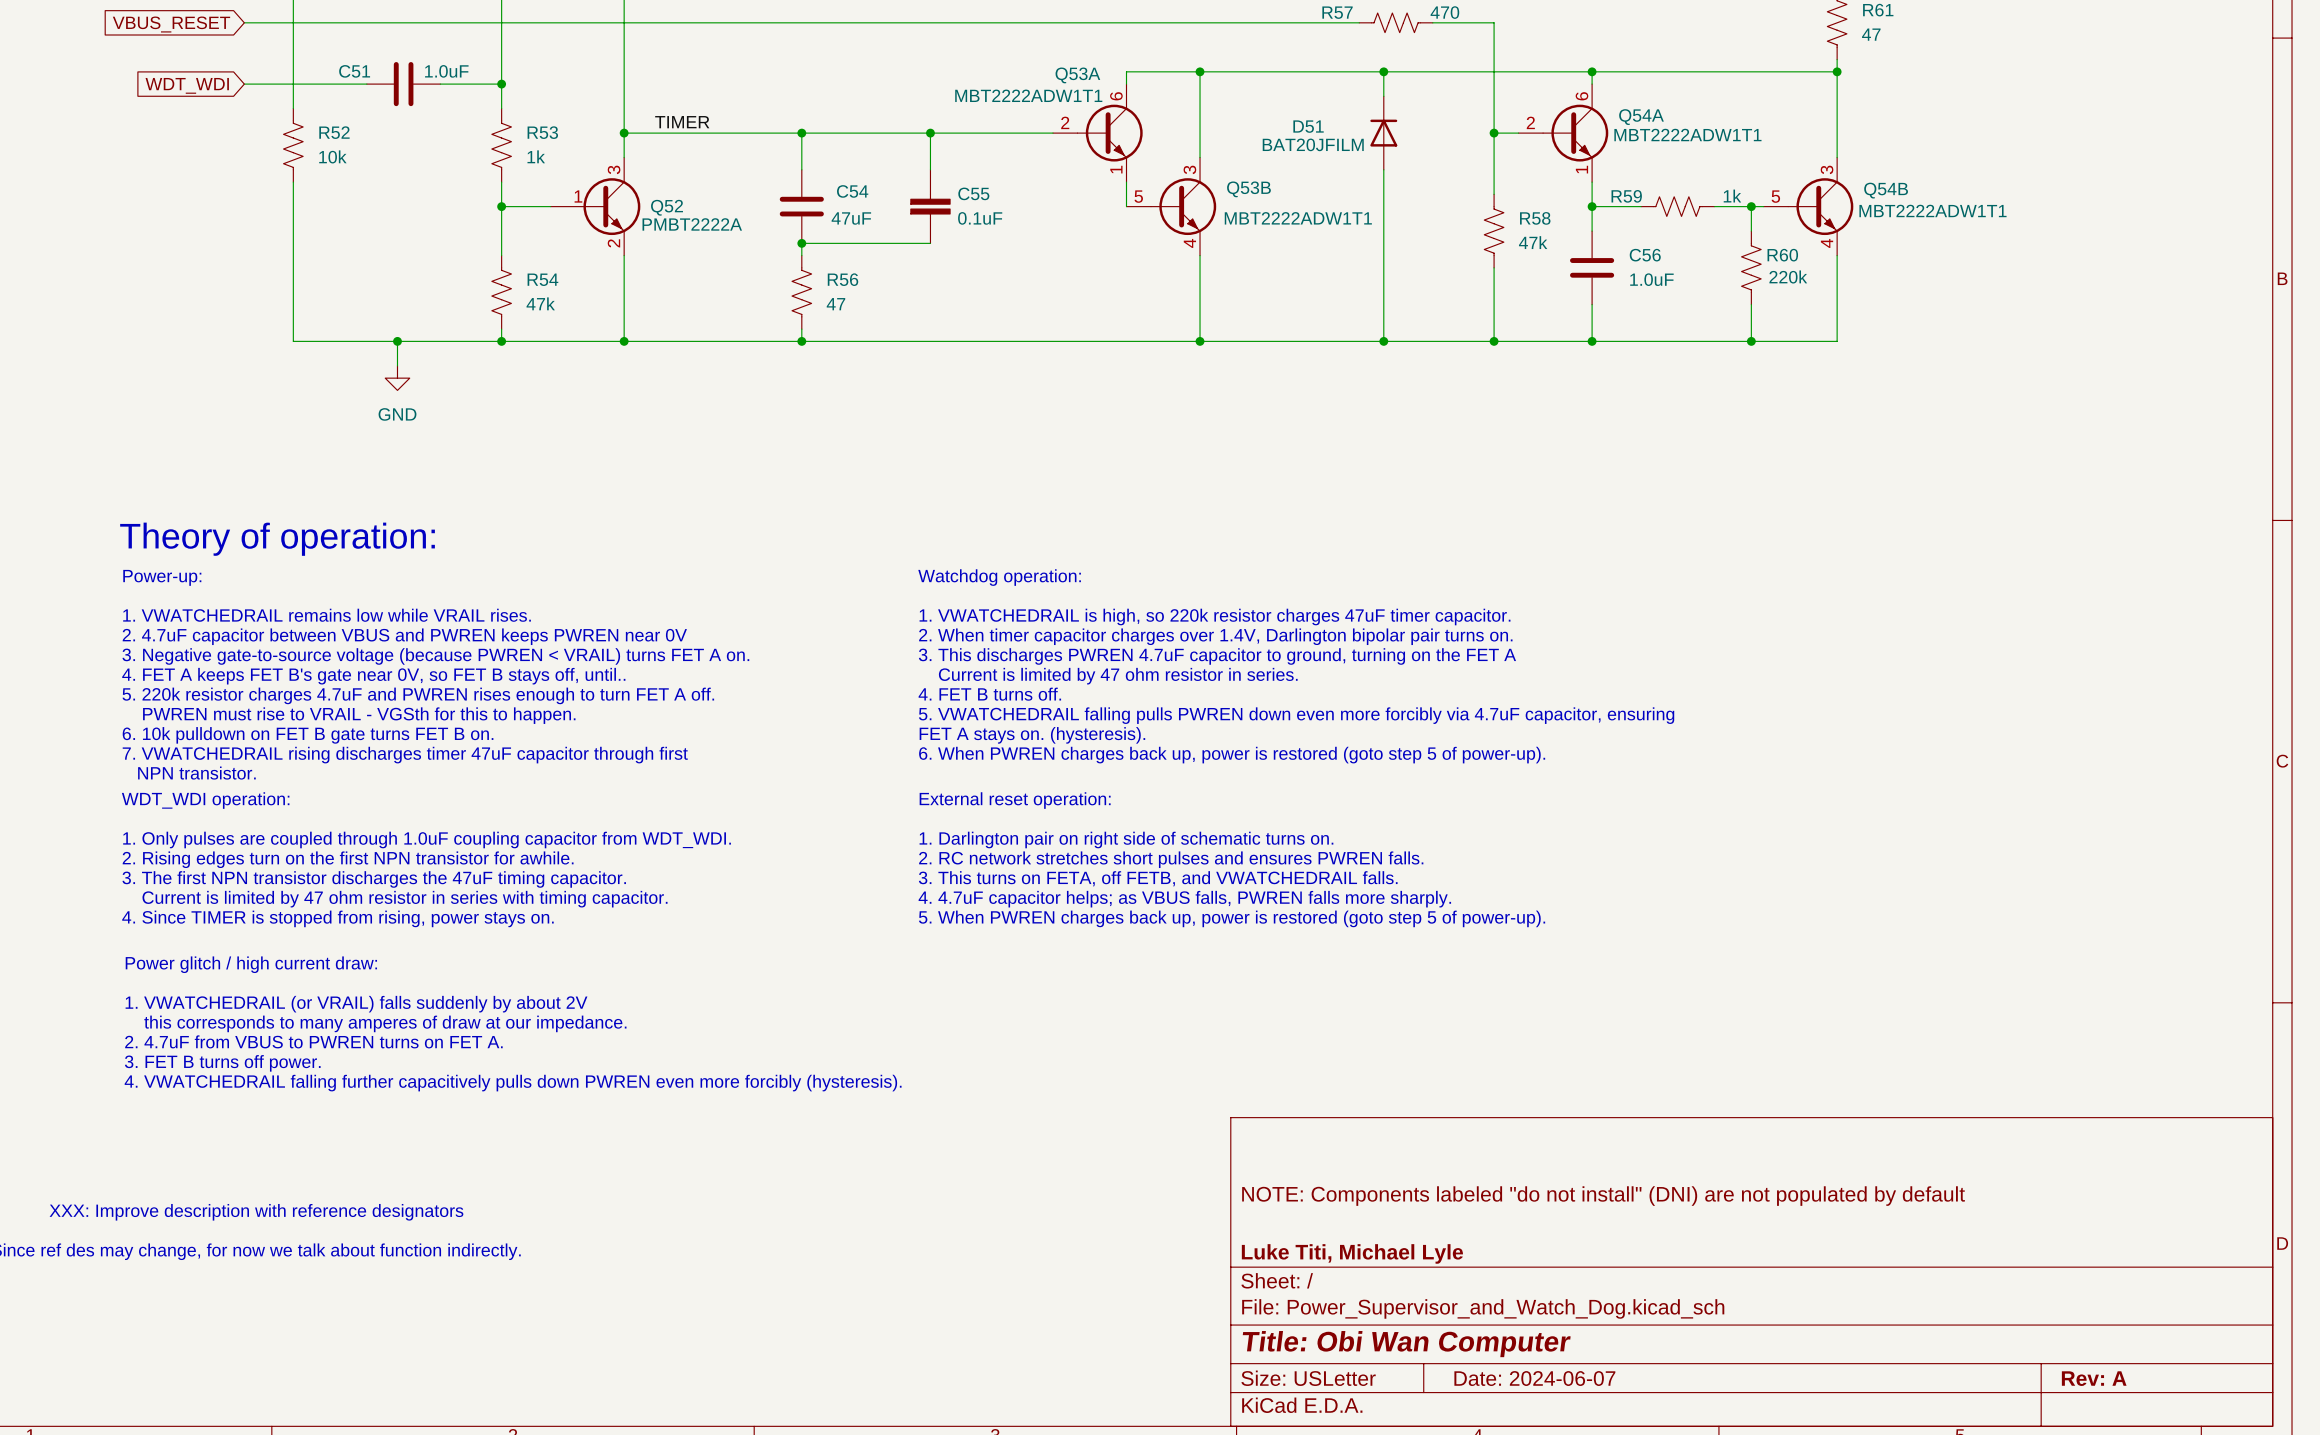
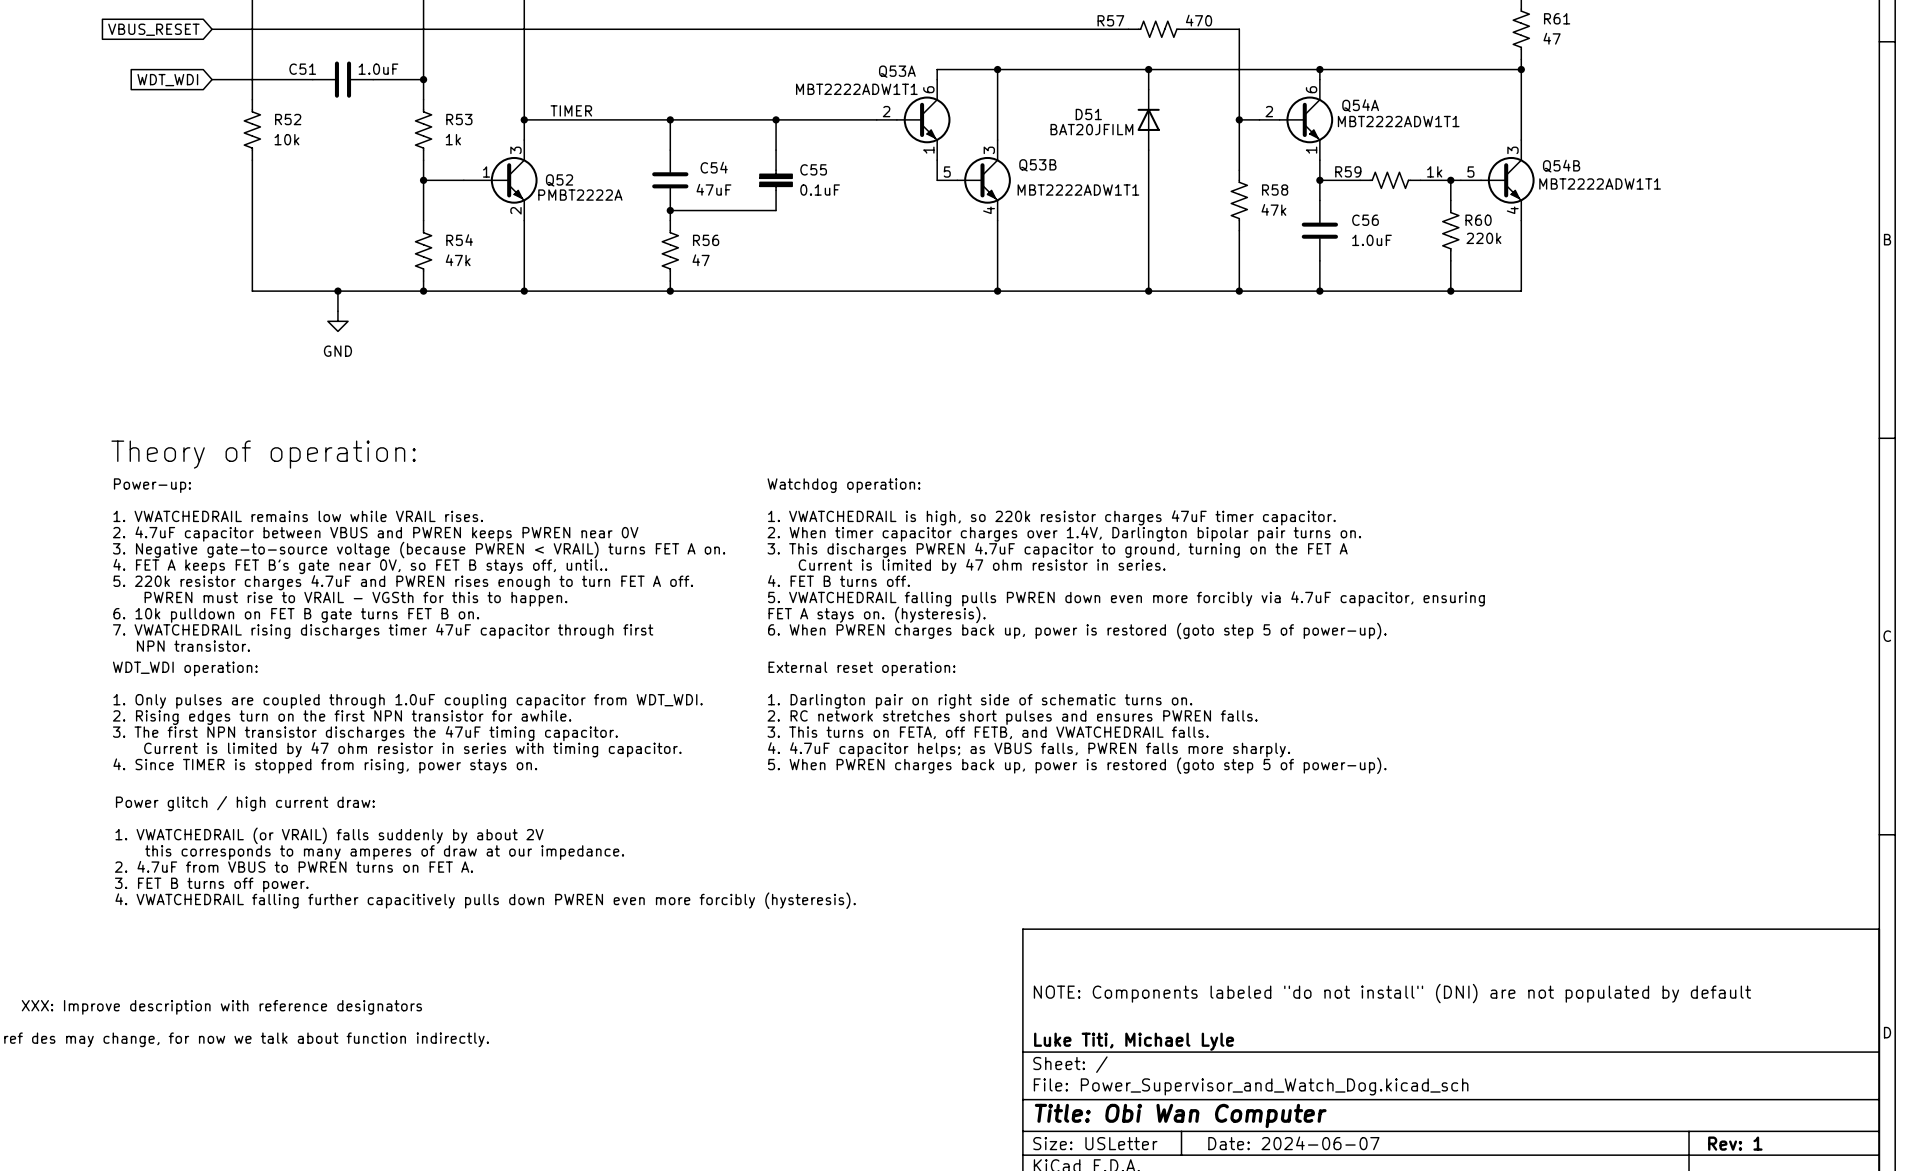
title block: Rev: A (2094, 1378) -> Rev: 1 (1735, 1143)

